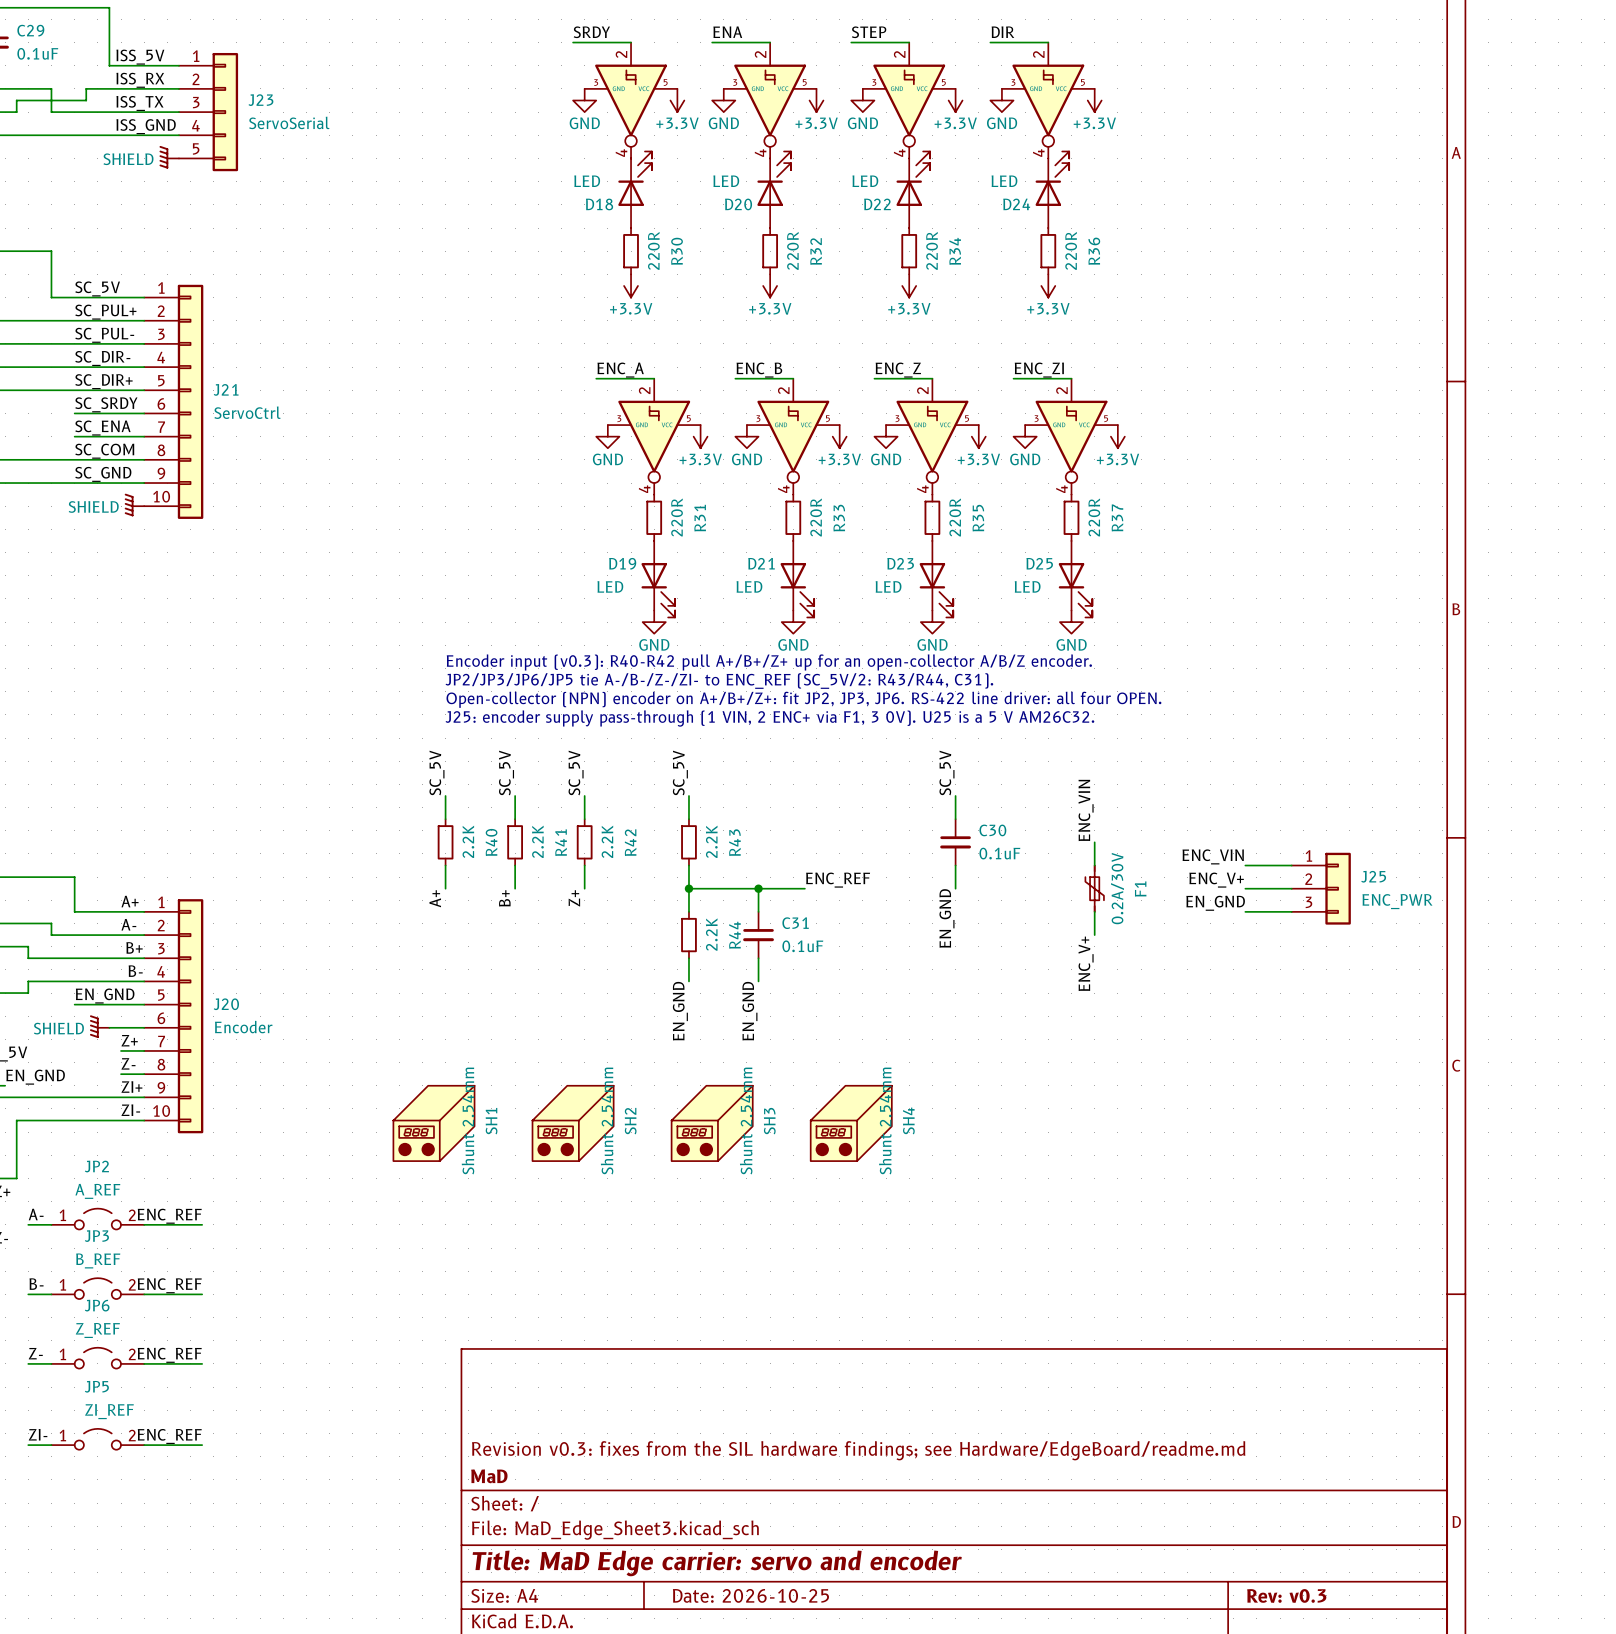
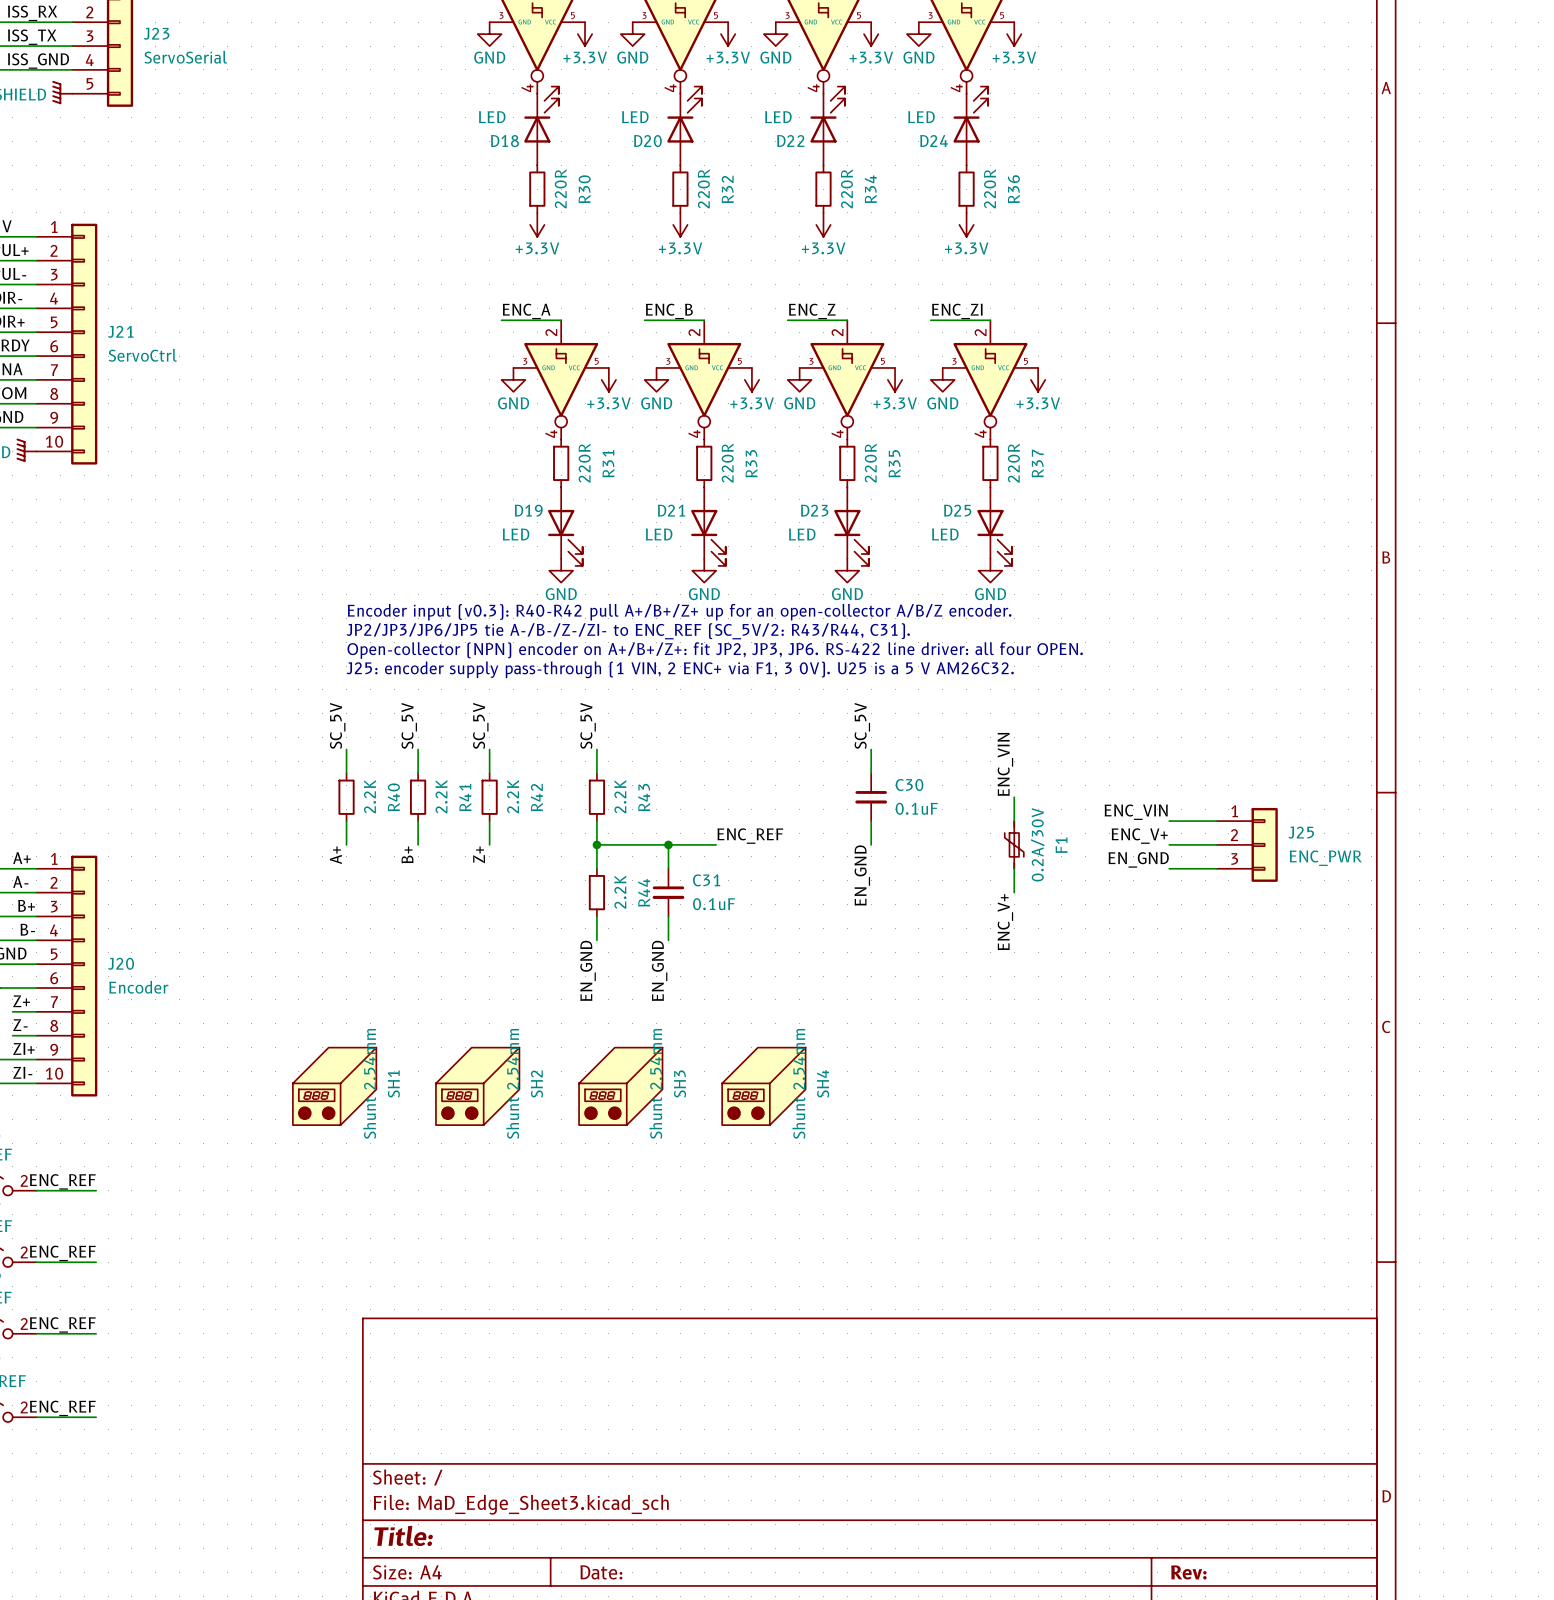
title block: Revision v0.3: fixes from the SIL hardware findings; see Hardware/EdgeBoard/readme.md (858, 1450) -> none
title block: MaD (489, 1476) -> none
title block: Title: MaD Edge carrier: servo and encoder (717, 1563) -> Title: (403, 1535)
title block: Date: 2026-10-25 (750, 1595) -> Date: (601, 1572)
title block: Rev: v0.3 (1286, 1595) -> Rev: (1188, 1572)

